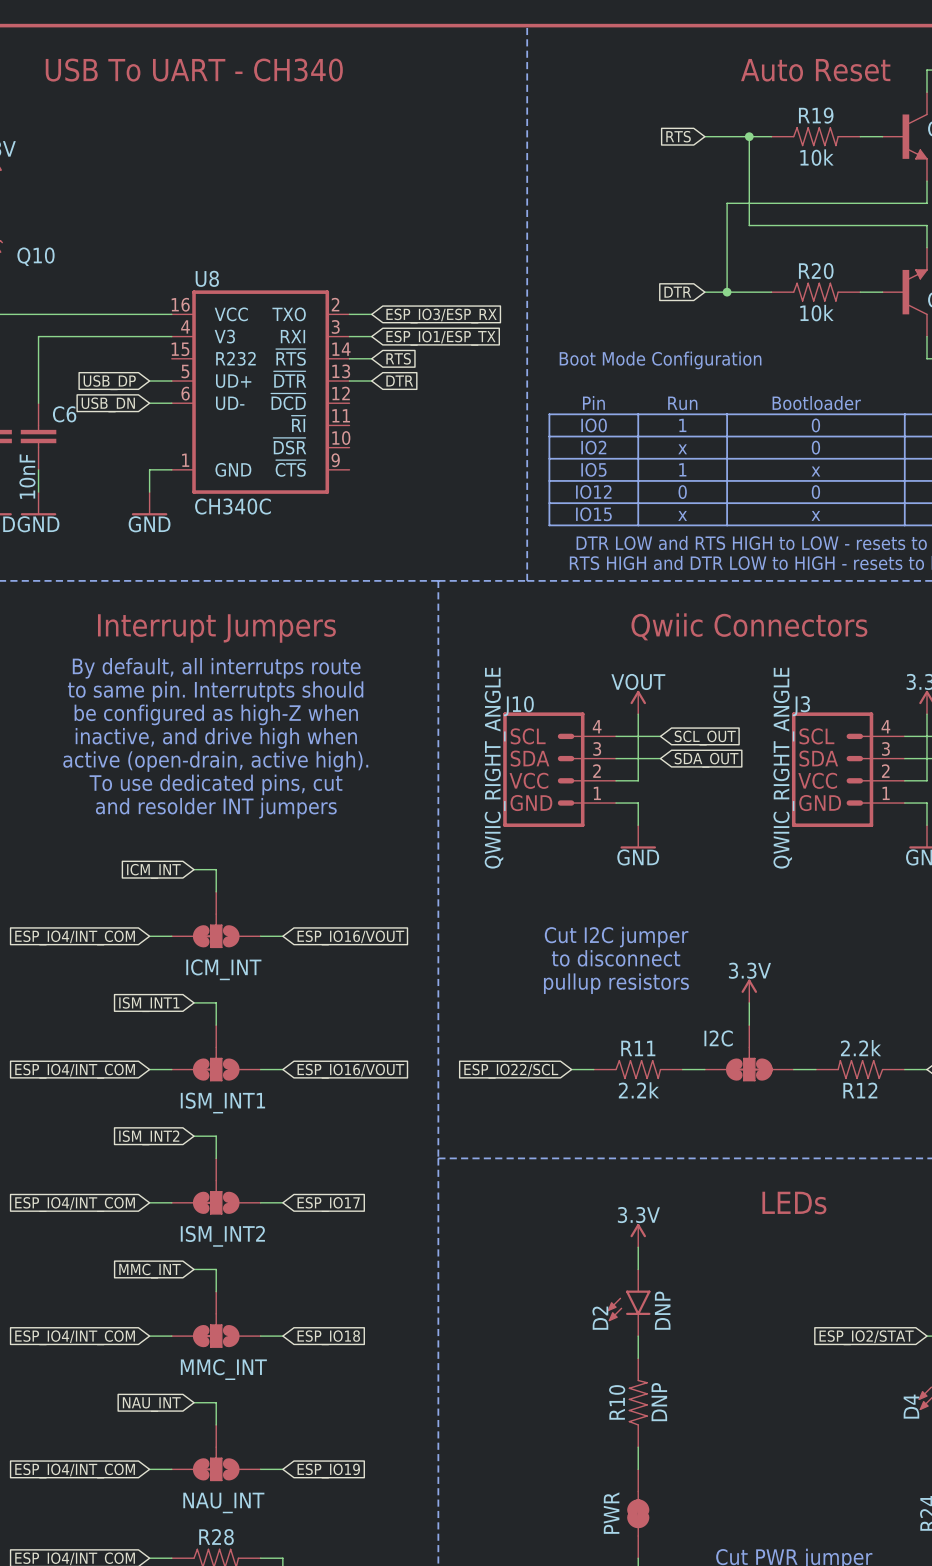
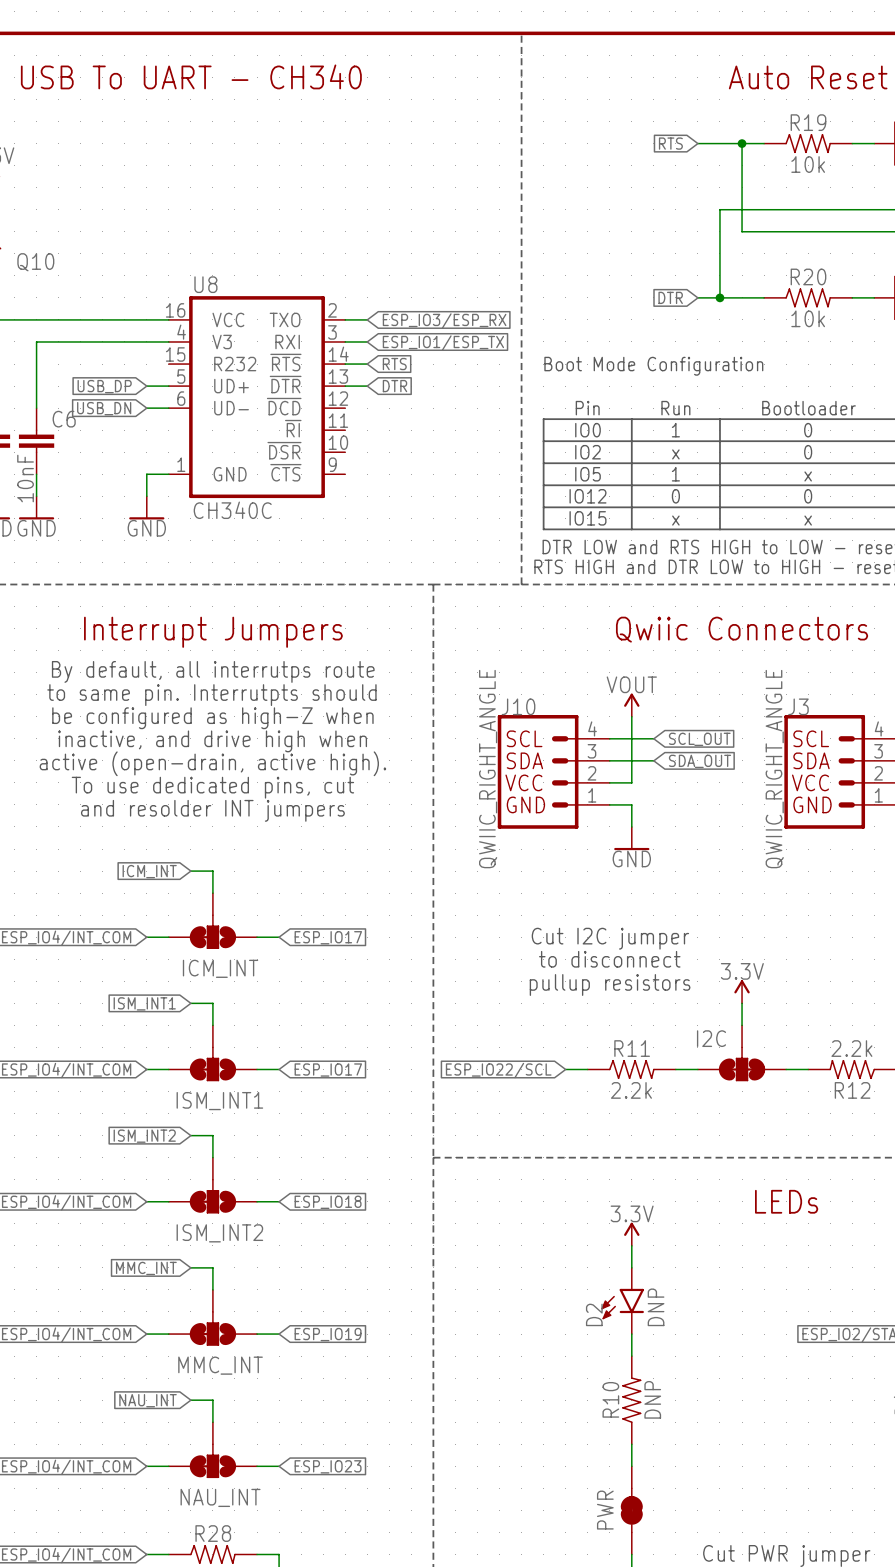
global label: ESP_IO16/VOUT (350, 937) -> ESP_IO17 (328, 937)
global label: ESP_IO16/VOUT (350, 1071) -> ESP_IO17 (328, 1070)
global label: ESP_IO17 (328, 1204) -> ESP_IO18 (328, 1202)
global label: ESP_IO18 (328, 1337) -> ESP_IO19 (328, 1334)
global label: ESP_IO19 (328, 1471) -> ESP_IO23 (328, 1466)

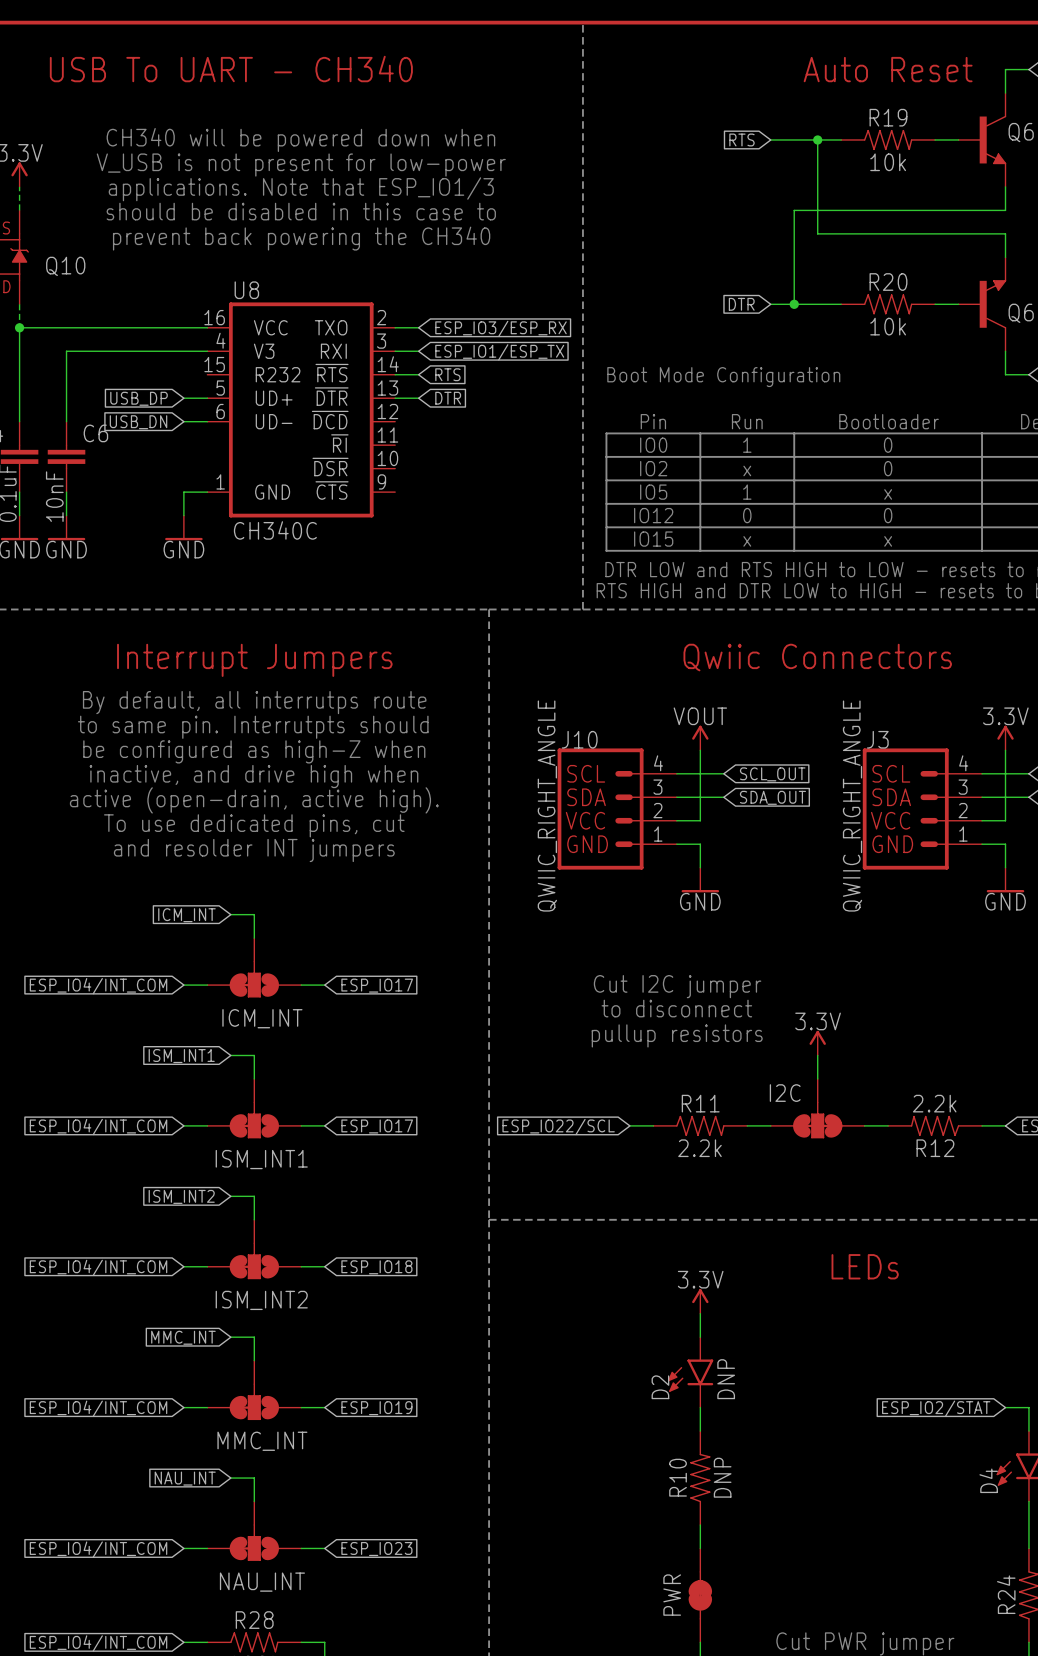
text: none -> CH340 will be powered down when (300, 139)
text: none -> V_USB is not present for low-power (301, 165)
text: none -> applications. Note that ESP_IO1/3 (301, 189)
text: none -> should be disabled in this case to (301, 211)
text: none -> prevent back powering the CH340 (301, 238)

